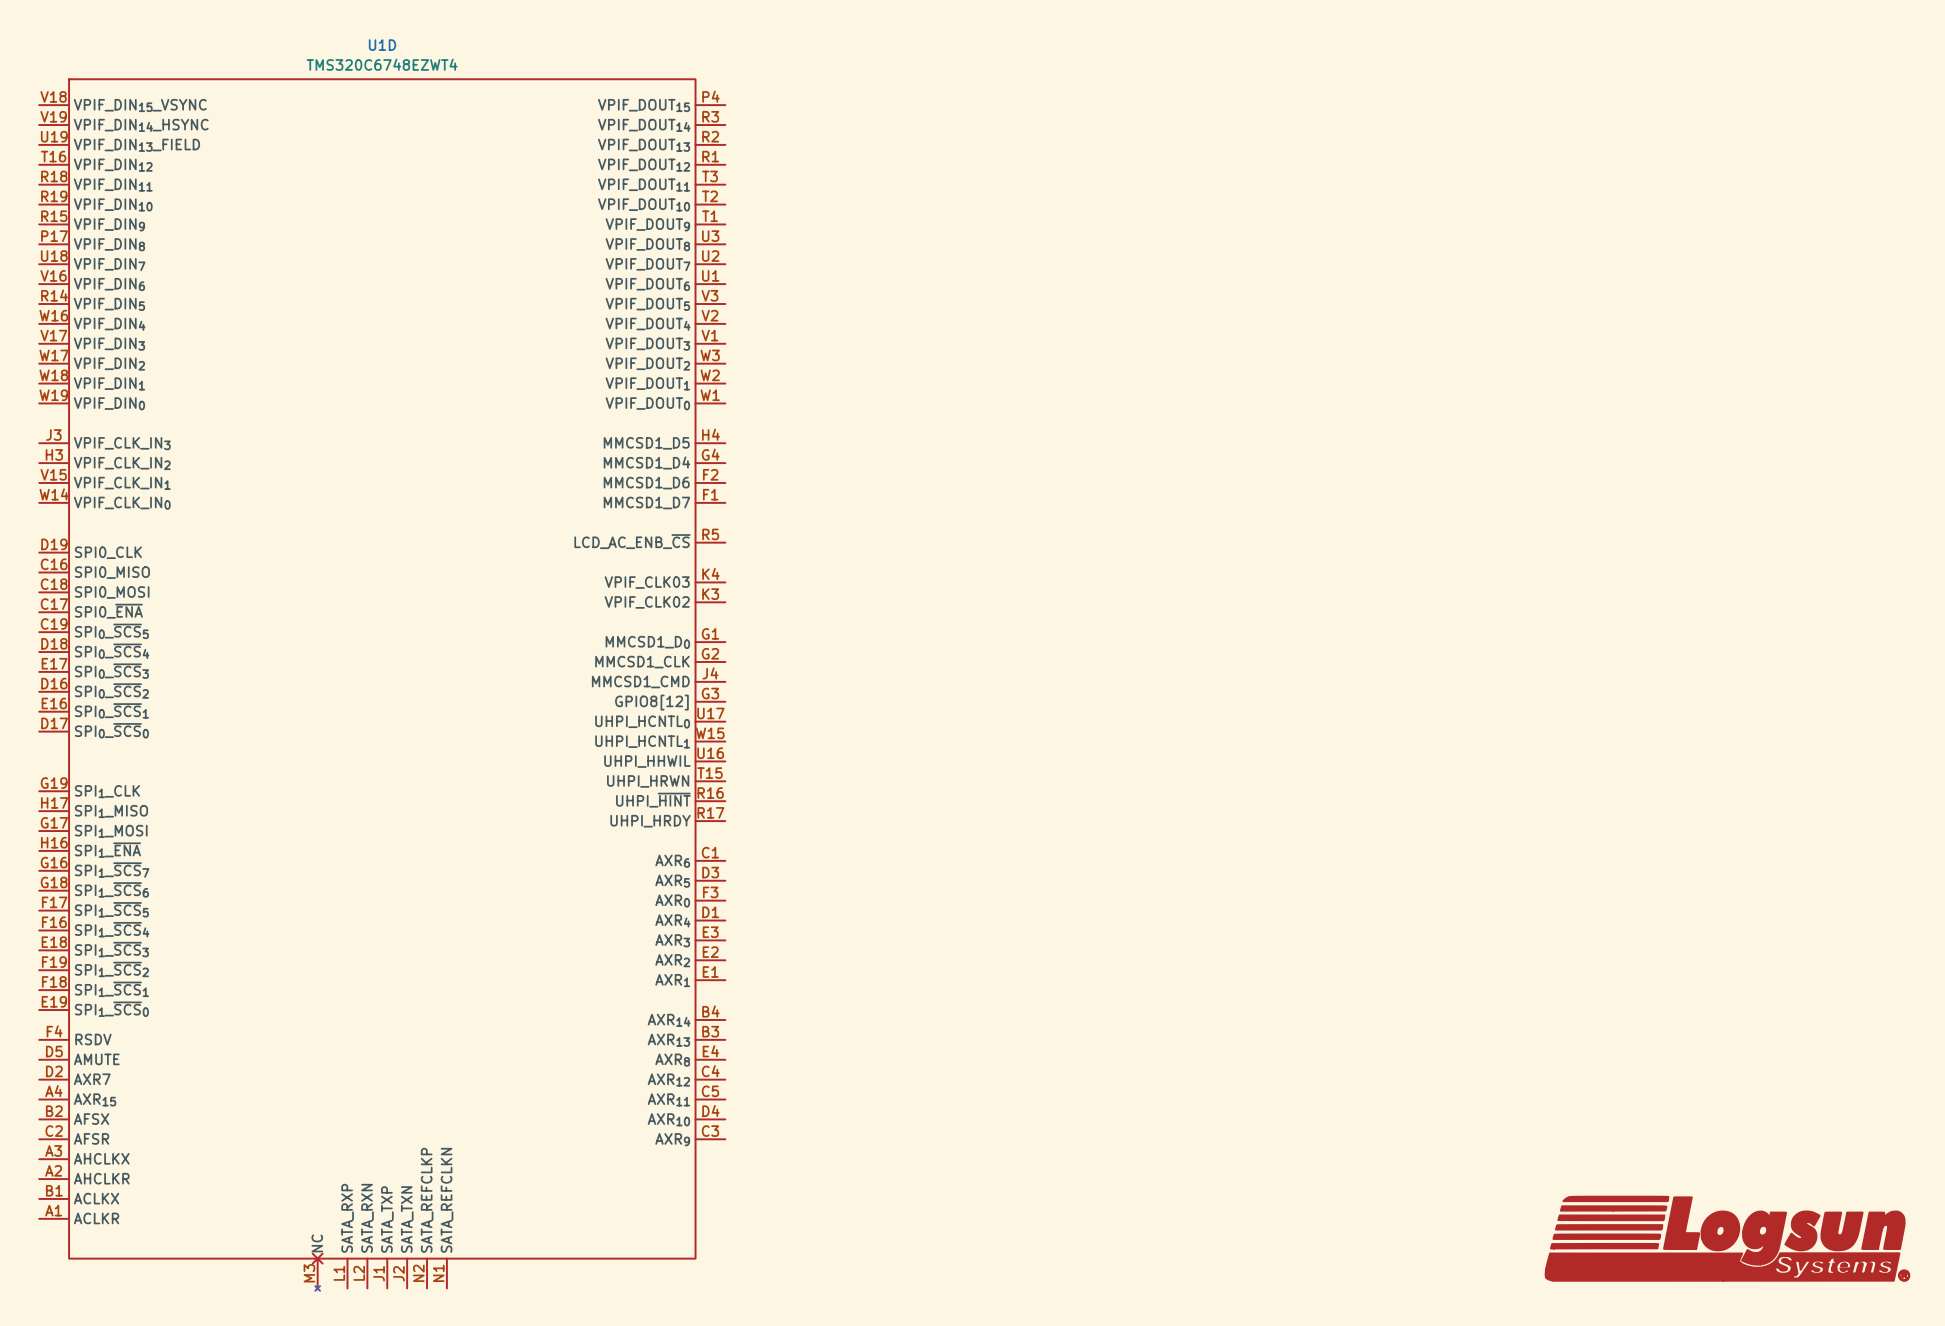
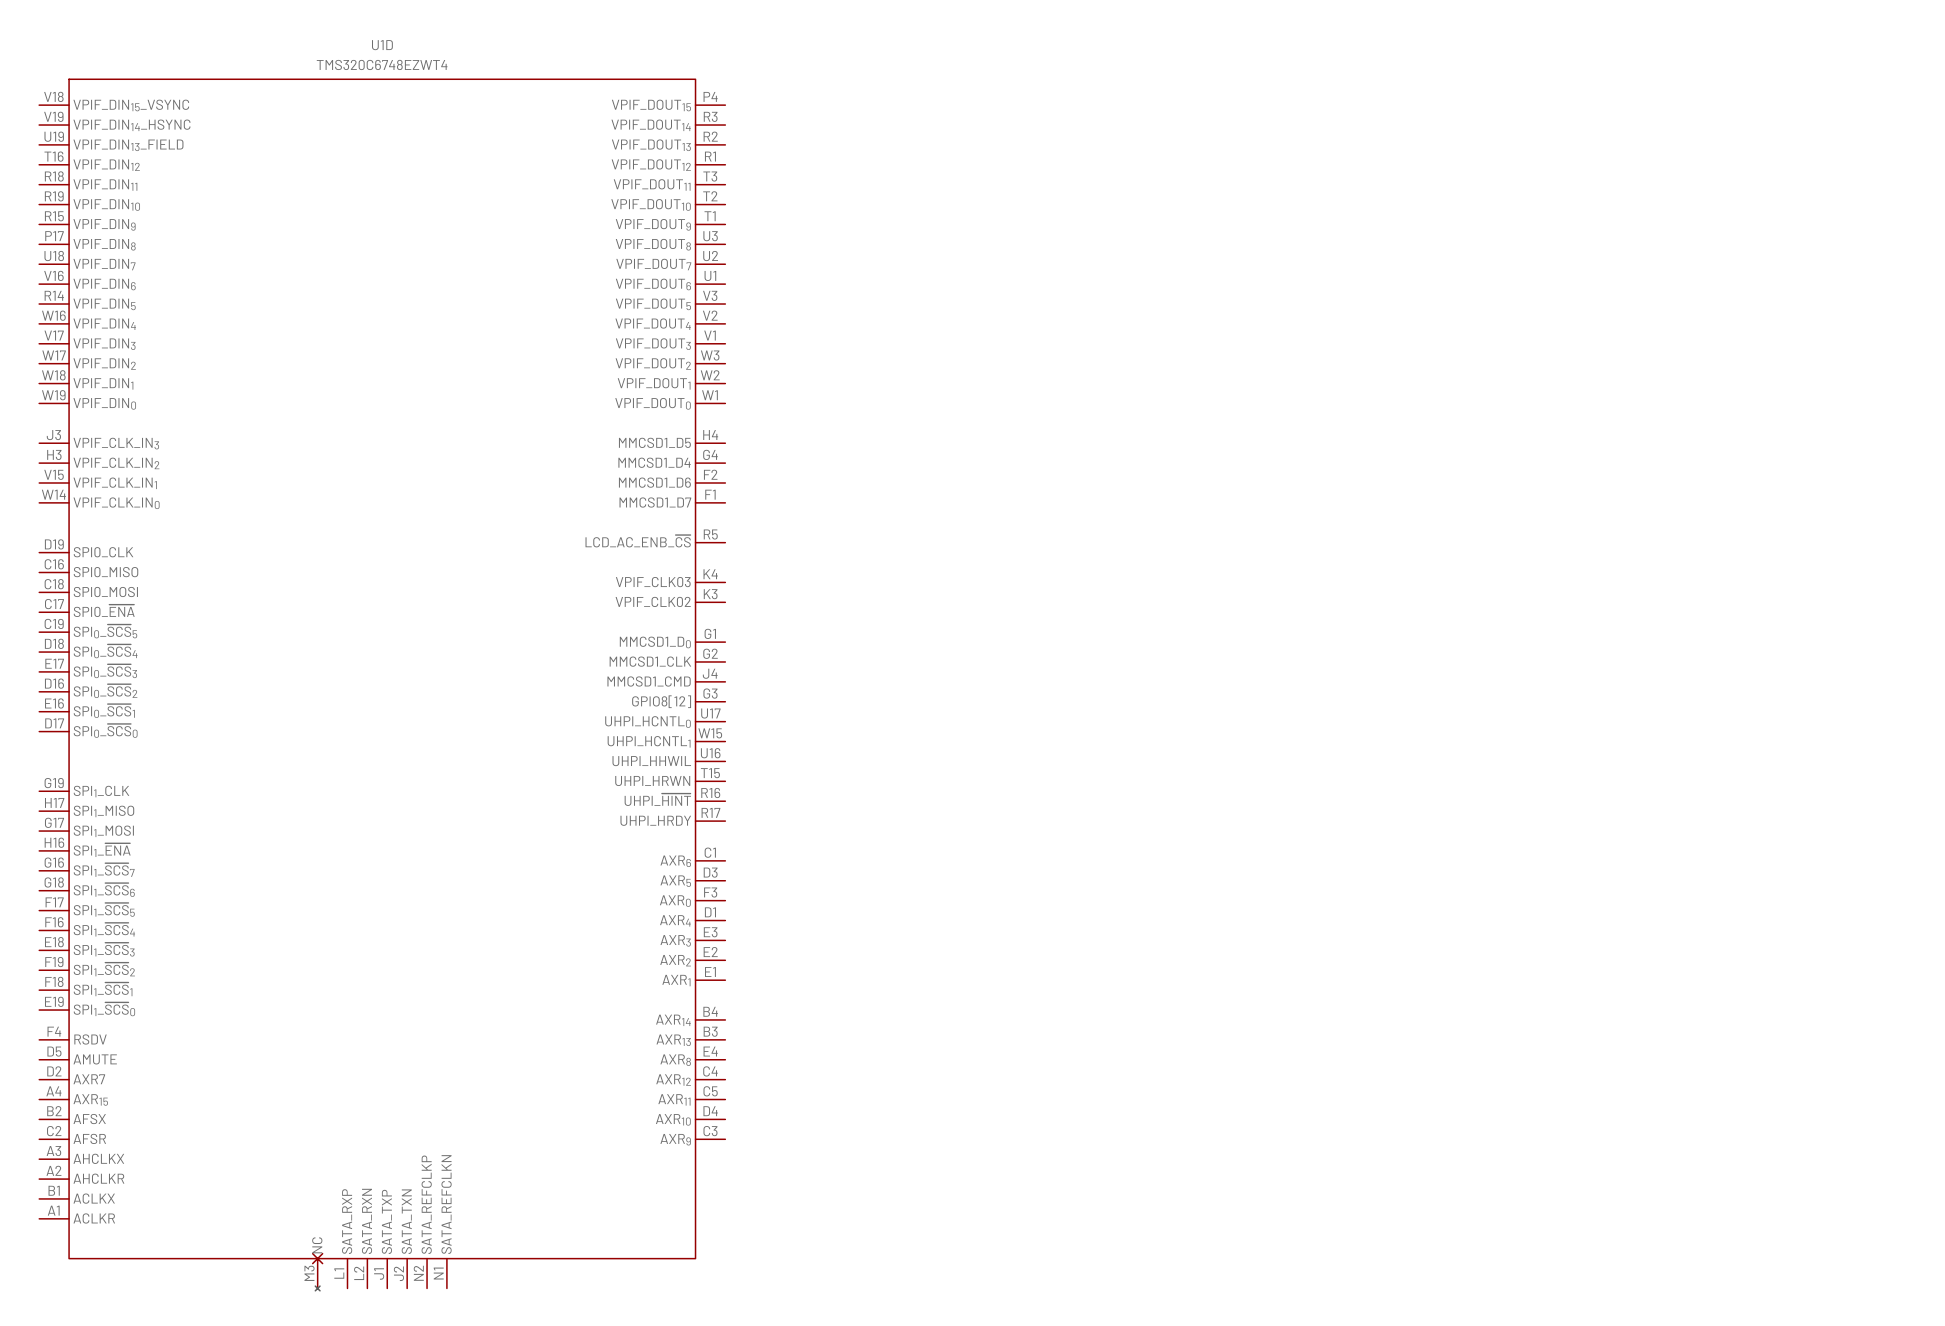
drawing: [1545, 1196, 1910, 1281] -> none

